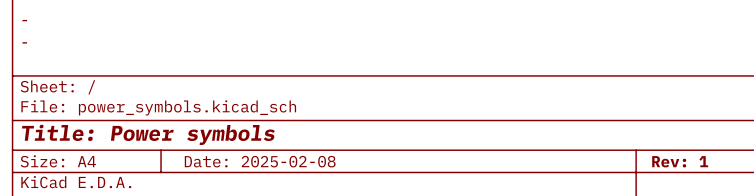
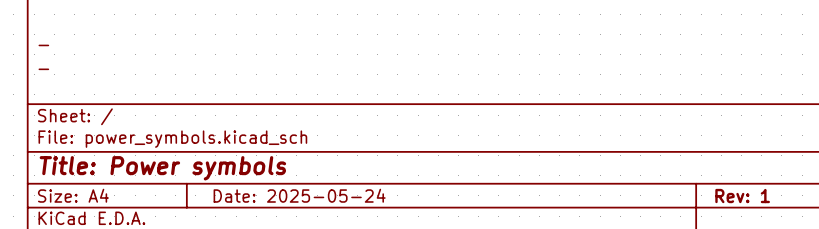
title block: Date: 2025-02-08 (260, 161) -> Date: 2025-05-24 (299, 195)

